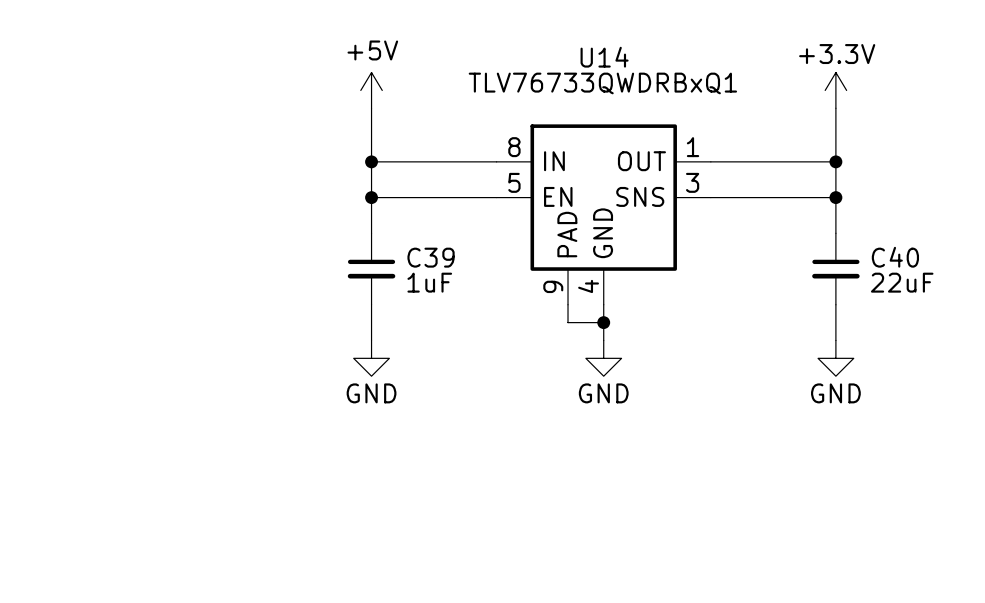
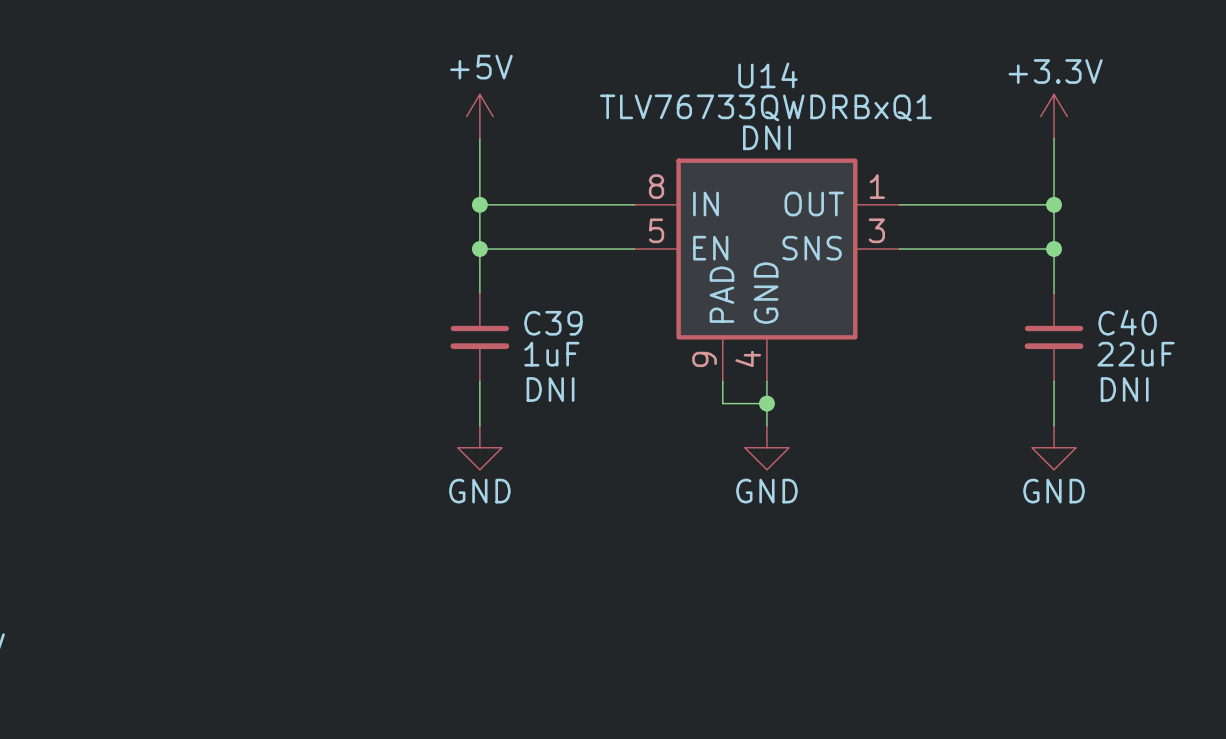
U14 text: none -> DNI (766, 137)
C39 text: none -> DNI (550, 389)
C40 text: none -> DNI (1124, 389)

